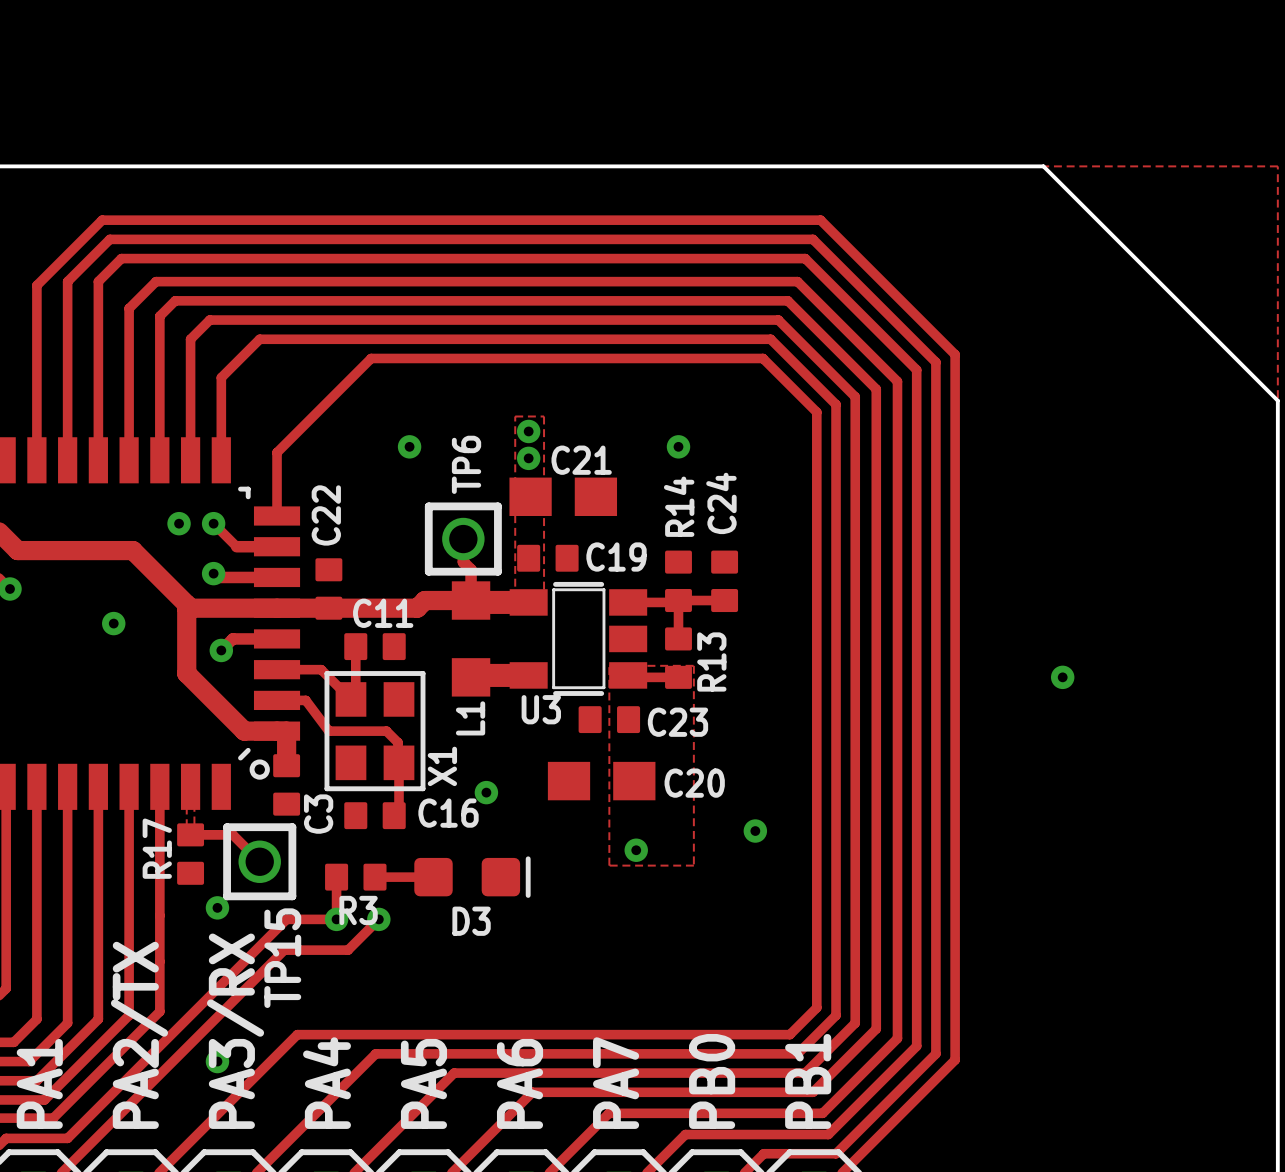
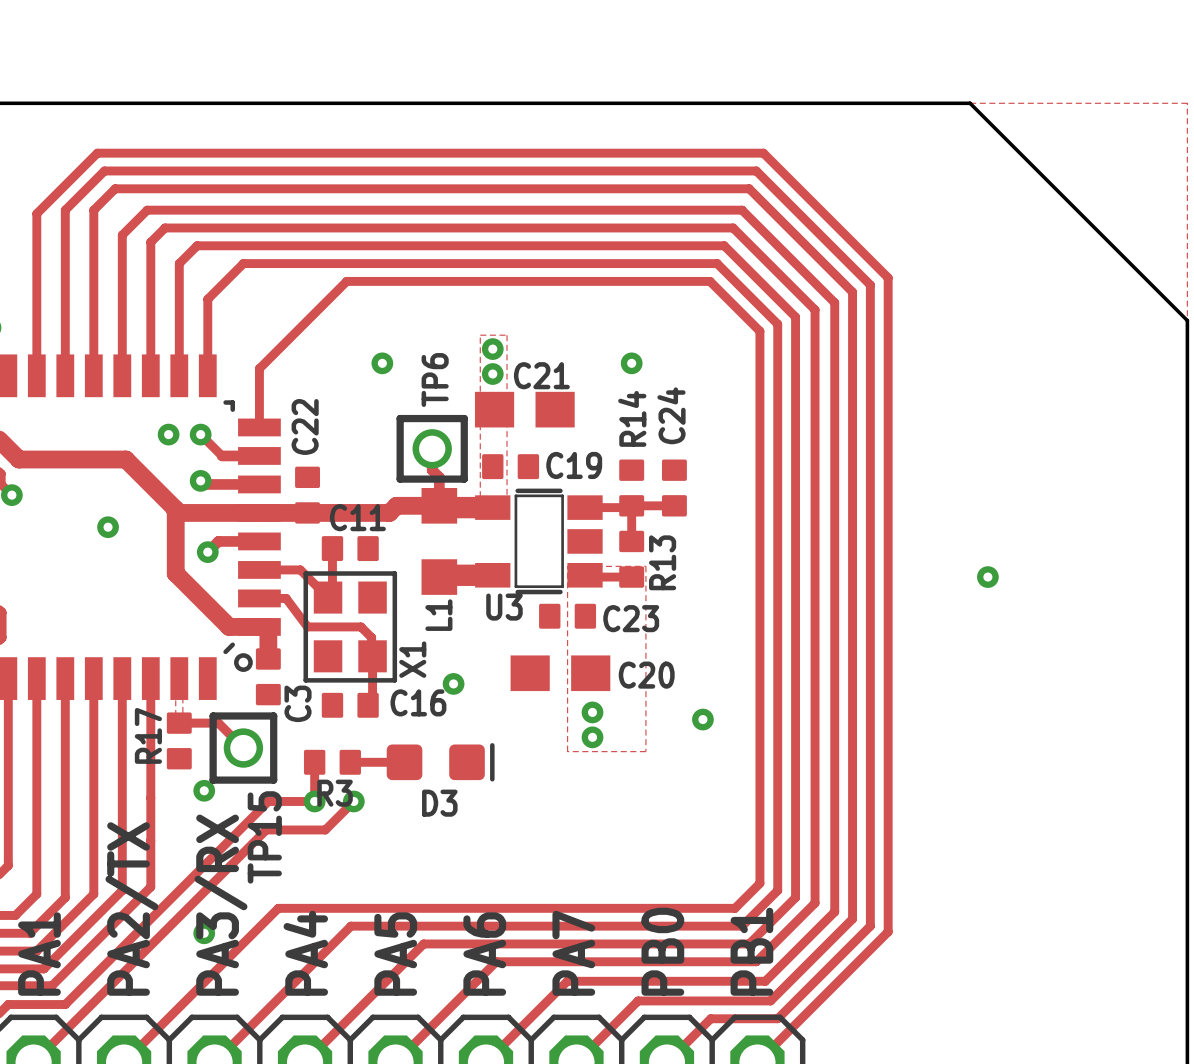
via: none -> (592, 712)

